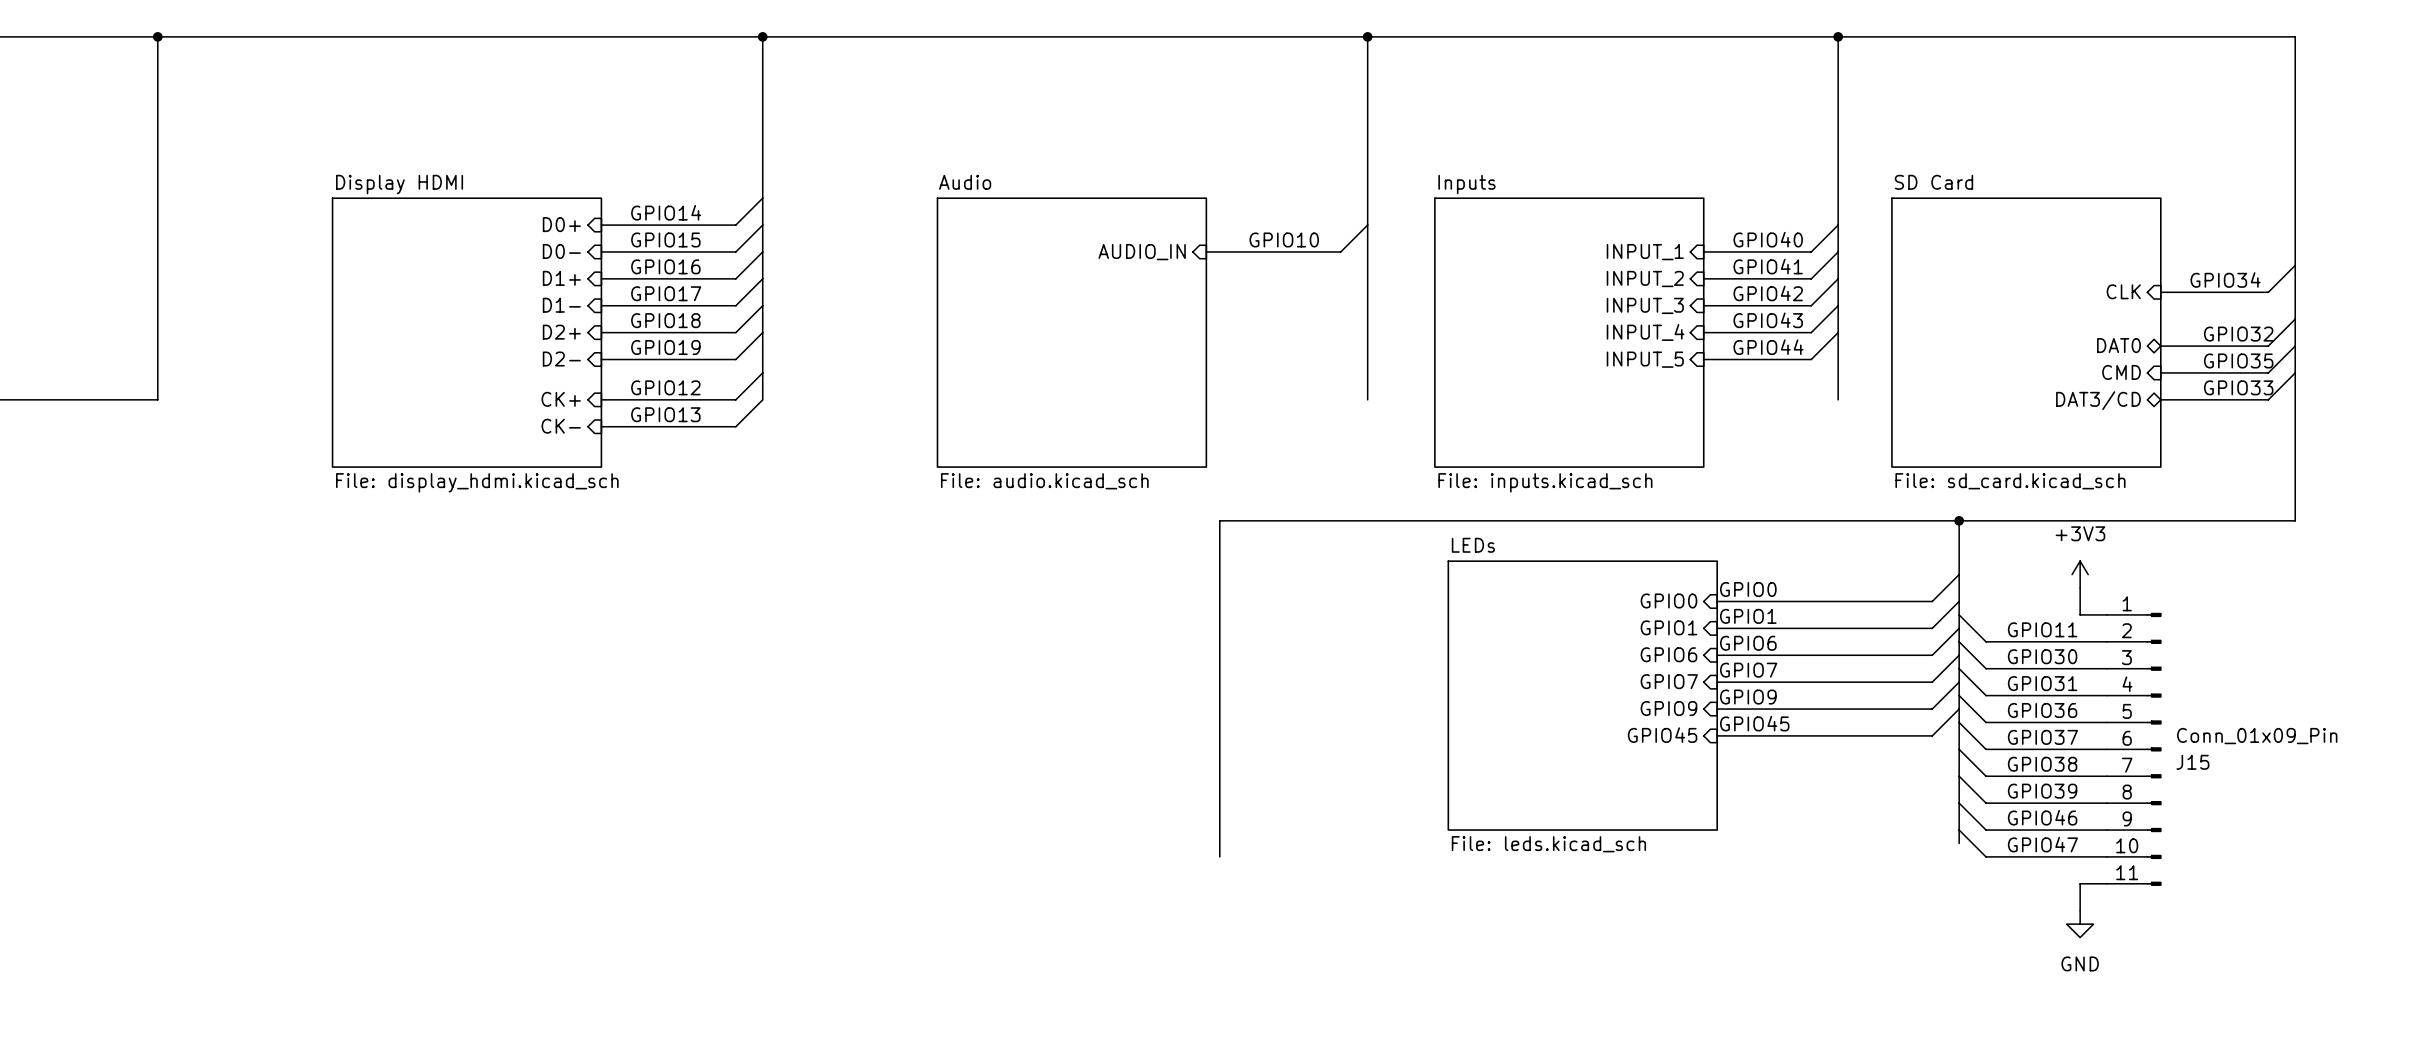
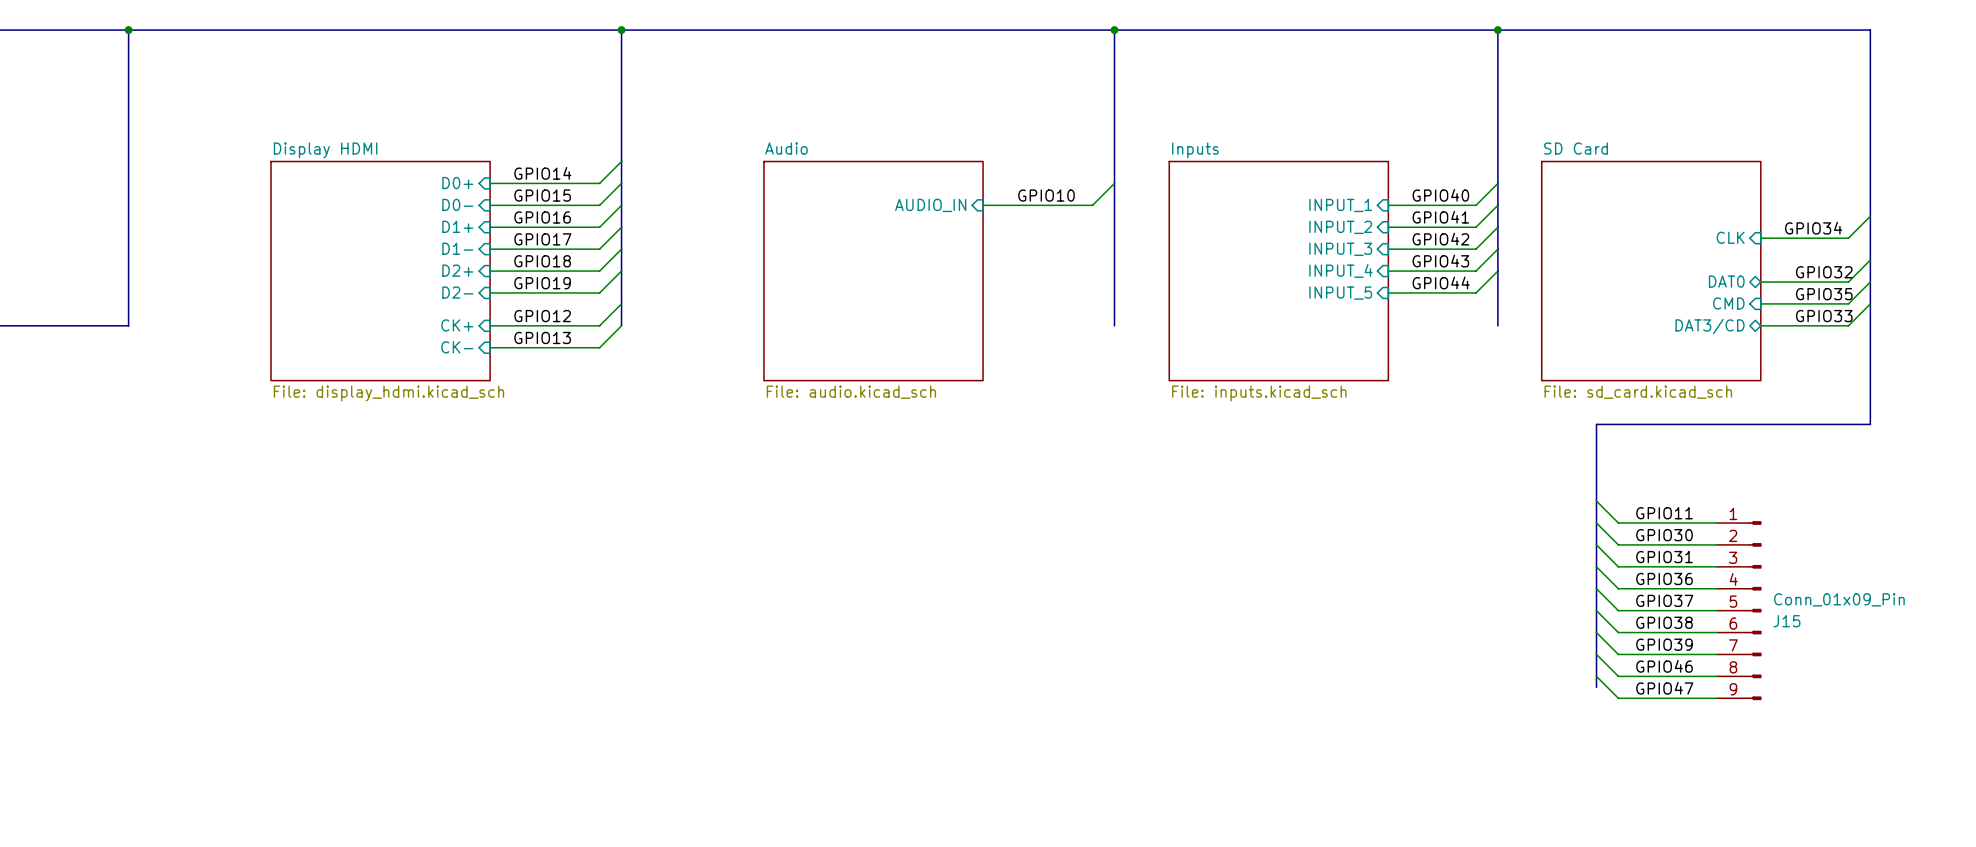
bus: (1959, 520) (1219, 520) (1219, 856) -> none
junction: (1959, 520) -> none
wire: (1959, 574) (1932, 601) (1717, 601) -> none
power symbol: +3V3 (2080, 574) -> none
wire: (2080, 588) (2080, 614) (2107, 614) -> none
label: GPIO0 (1748, 589) -> none
sheet pin: GPIO0 (1668, 600) -> none
wire: (1959, 601) (1932, 628) (1717, 628) -> none
J15 symbol: [2107, 612, 2162, 886] -> [1717, 521, 1762, 701]
label: GPIO1 (1748, 616) -> none
sheet pin: GPIO1 (1668, 627) -> none
wire: (1959, 628) (1932, 655) (1717, 655) -> none
label: GPIO6 (1748, 643) -> none
sheet pin: GPIO6 (1668, 654) -> none
wire: (1959, 655) (1932, 682) (1717, 682) -> none
label: GPIO7 (1748, 670) -> none
sheet pin: GPIO7 (1669, 681) -> none
wire: (1959, 682) (1932, 709) (1717, 709) -> none
sheet LEDs: File: leds.kicad_sch (1582, 695) -> none
label: GPIO9 (1748, 697) -> none
sheet pin: GPIO9 (1668, 708) -> none
wire: (1959, 709) (1932, 735) (1717, 735) -> none
label: GPIO45 (1754, 723) -> none
sheet pin: GPIO45 (1662, 735) -> none
wire: (2107, 883) (2080, 883) (2080, 910) -> none
power symbol: GND (2080, 924) -> none

